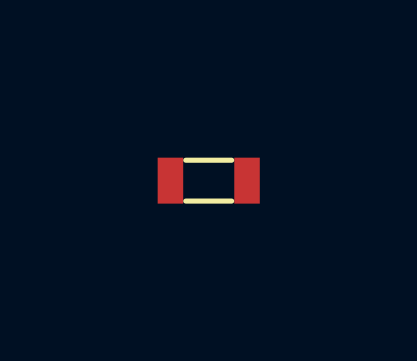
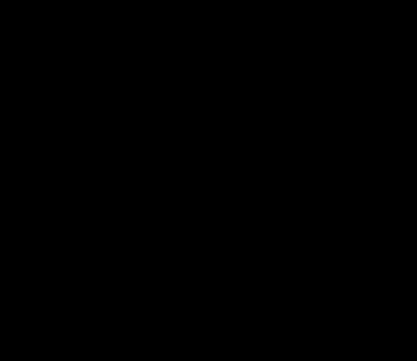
part: (208, 180) -> none

